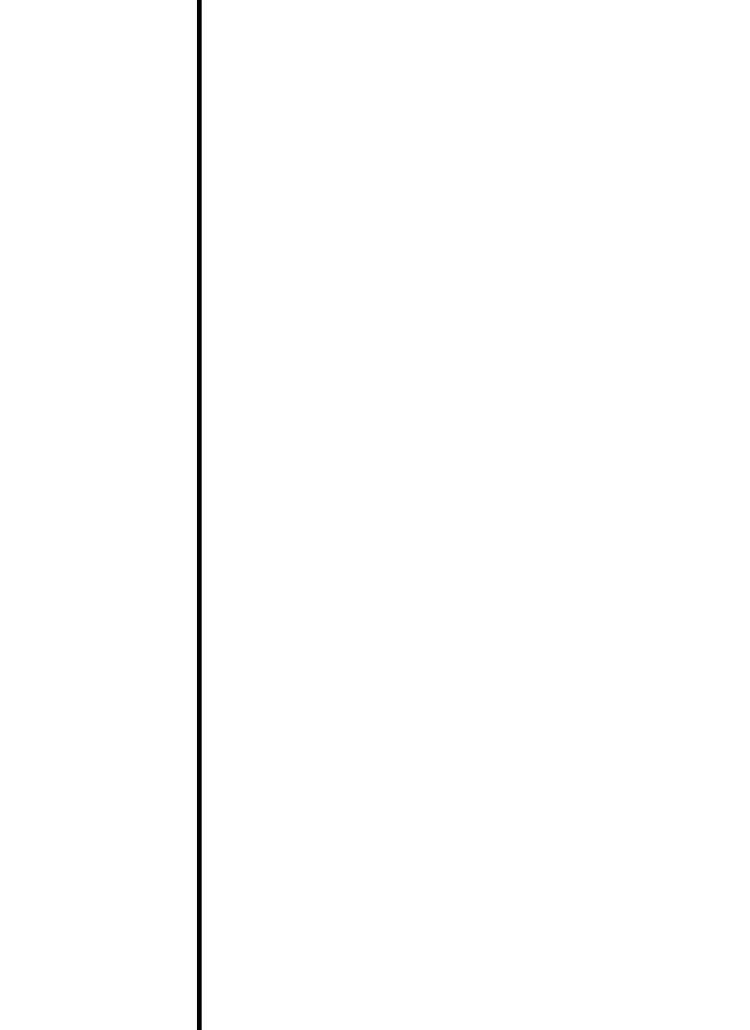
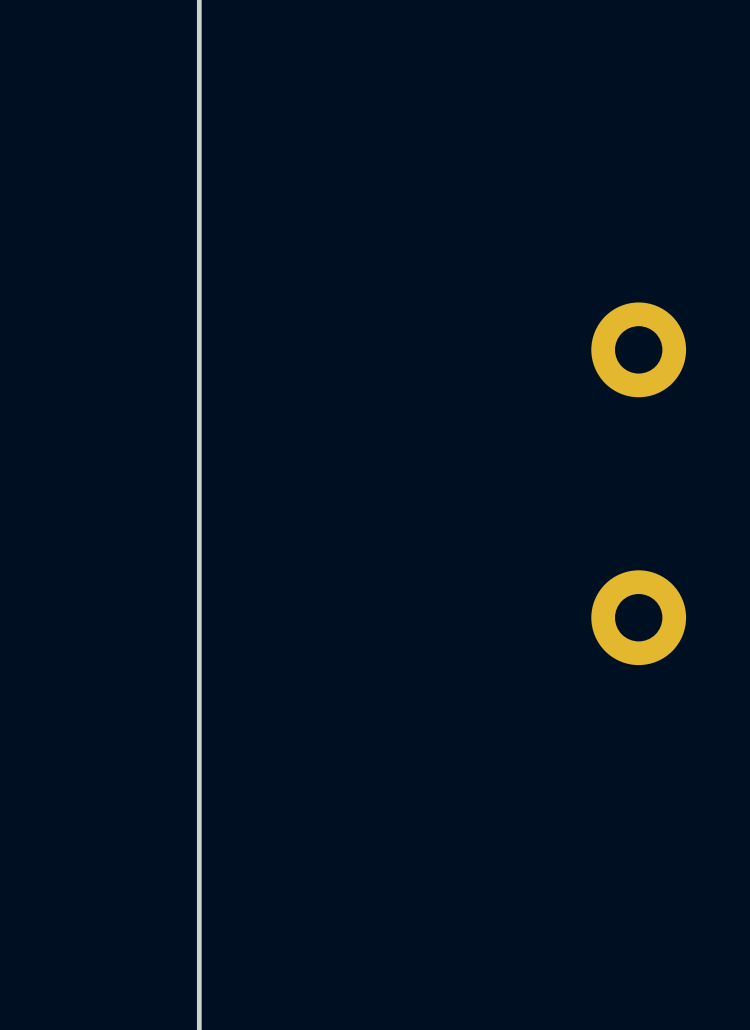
part: none -> (638, 349)
part: none -> (638, 617)

